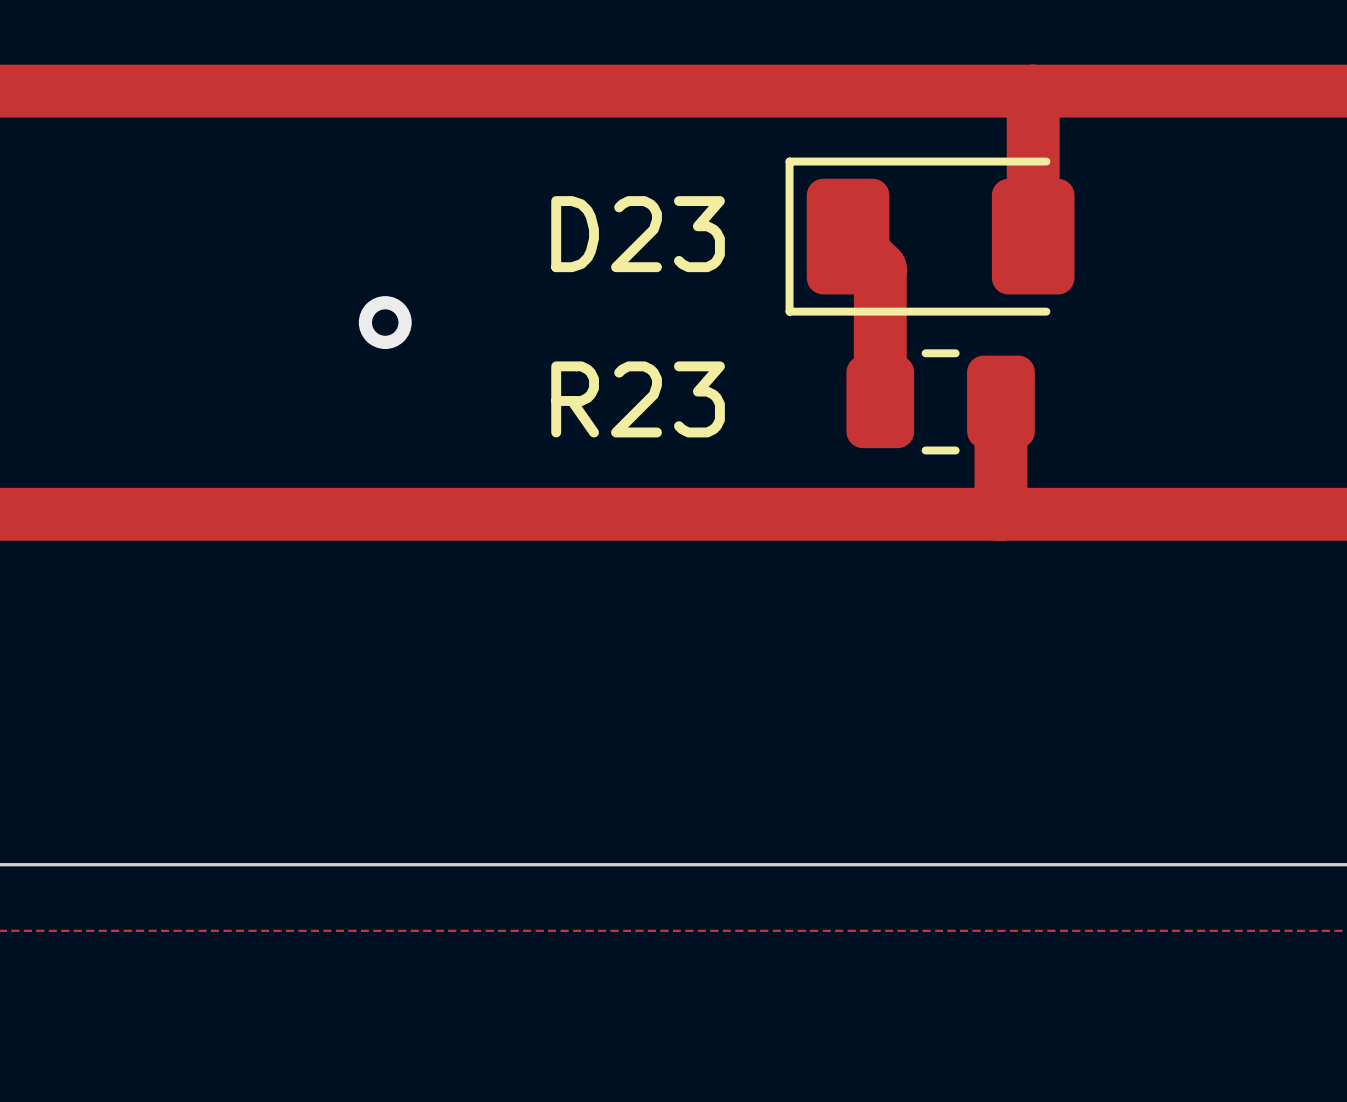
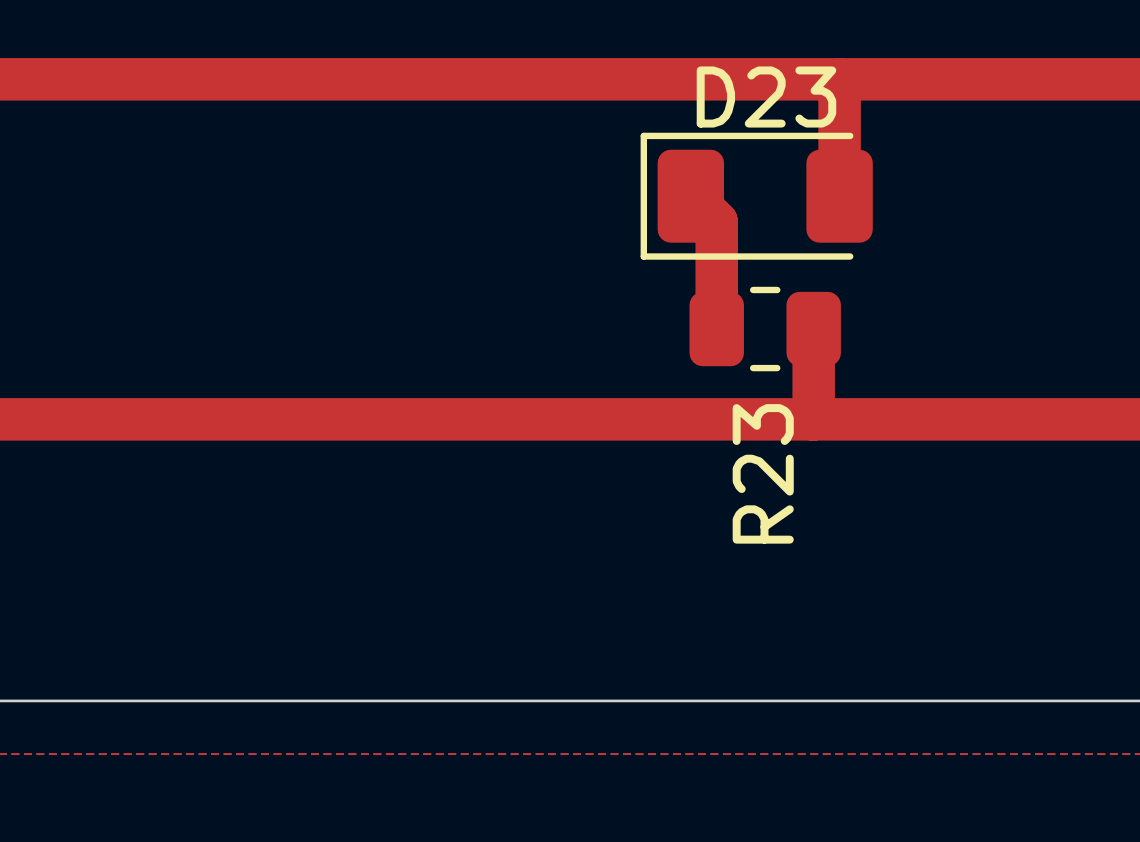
D23 name position: D23 (638, 234) -> D23 (766, 97)
via: (385, 322) -> none
R23 name rotation: 0° (638, 399) -> 90° counterclockwise (763, 473)
R23 name position: R23 (638, 399) -> R23 (763, 473)

